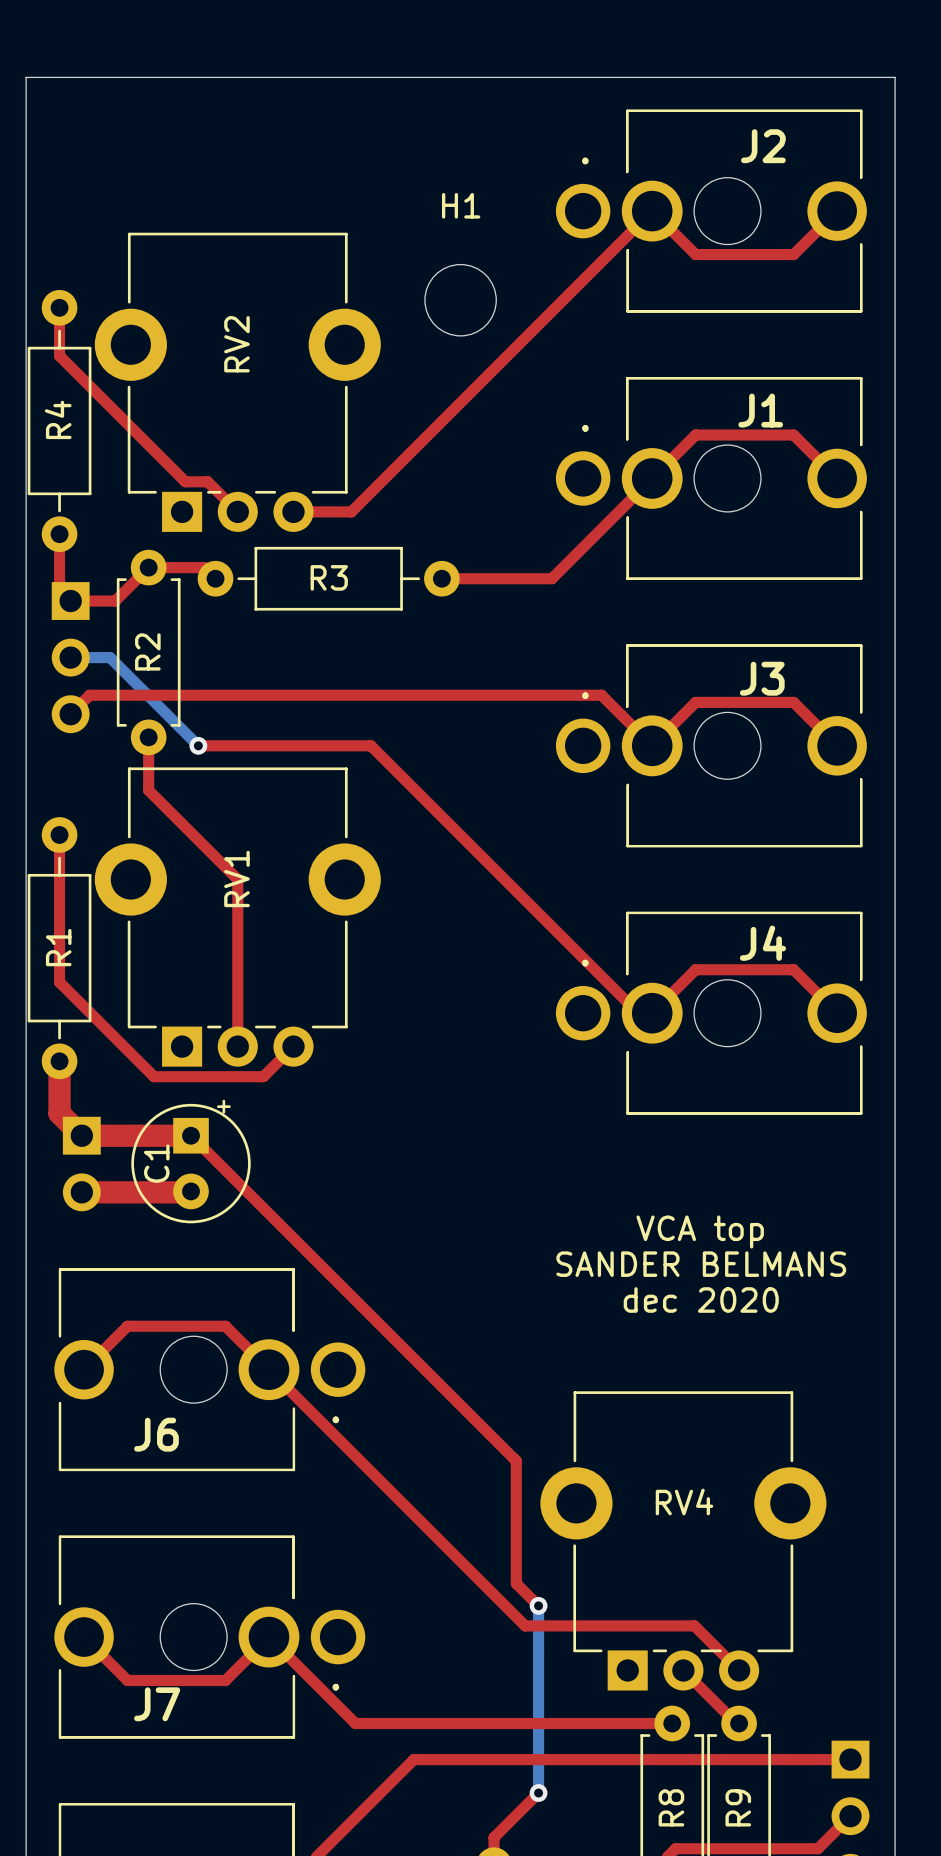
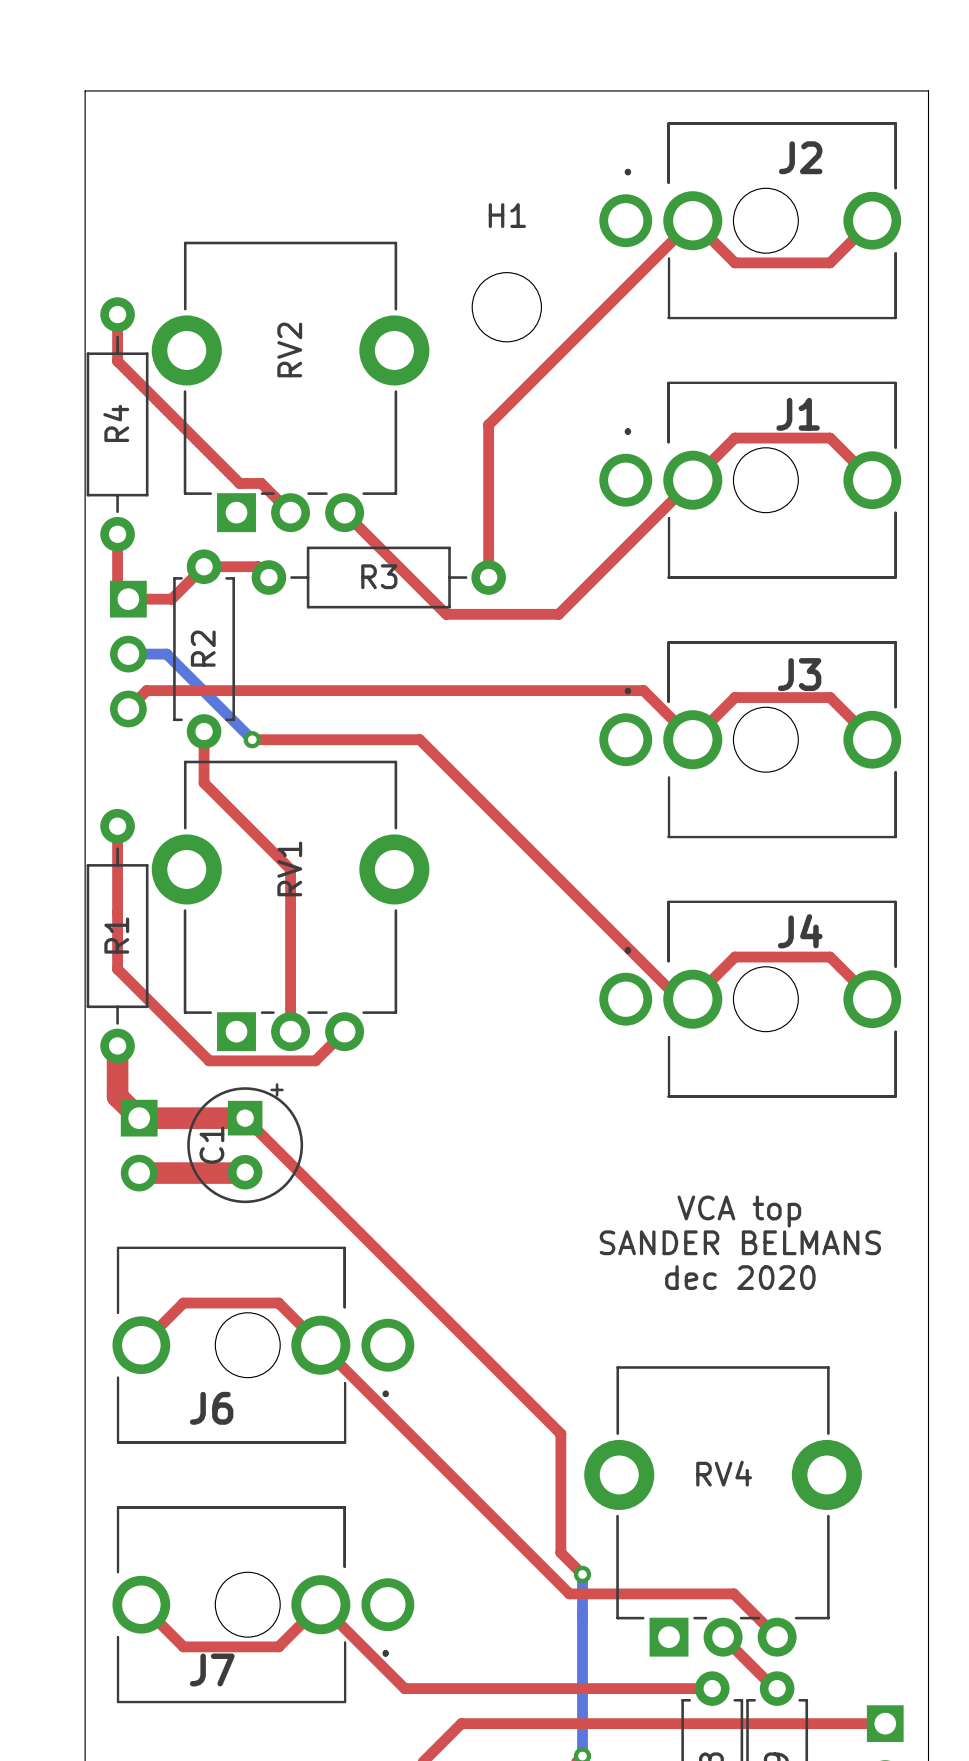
top track: (441, 421) (351, 511) (293, 511) -> (488, 424) (488, 577)
top track: (441, 578) (551, 578) -> (344, 512) (446, 614) (558, 614) (595, 577)

